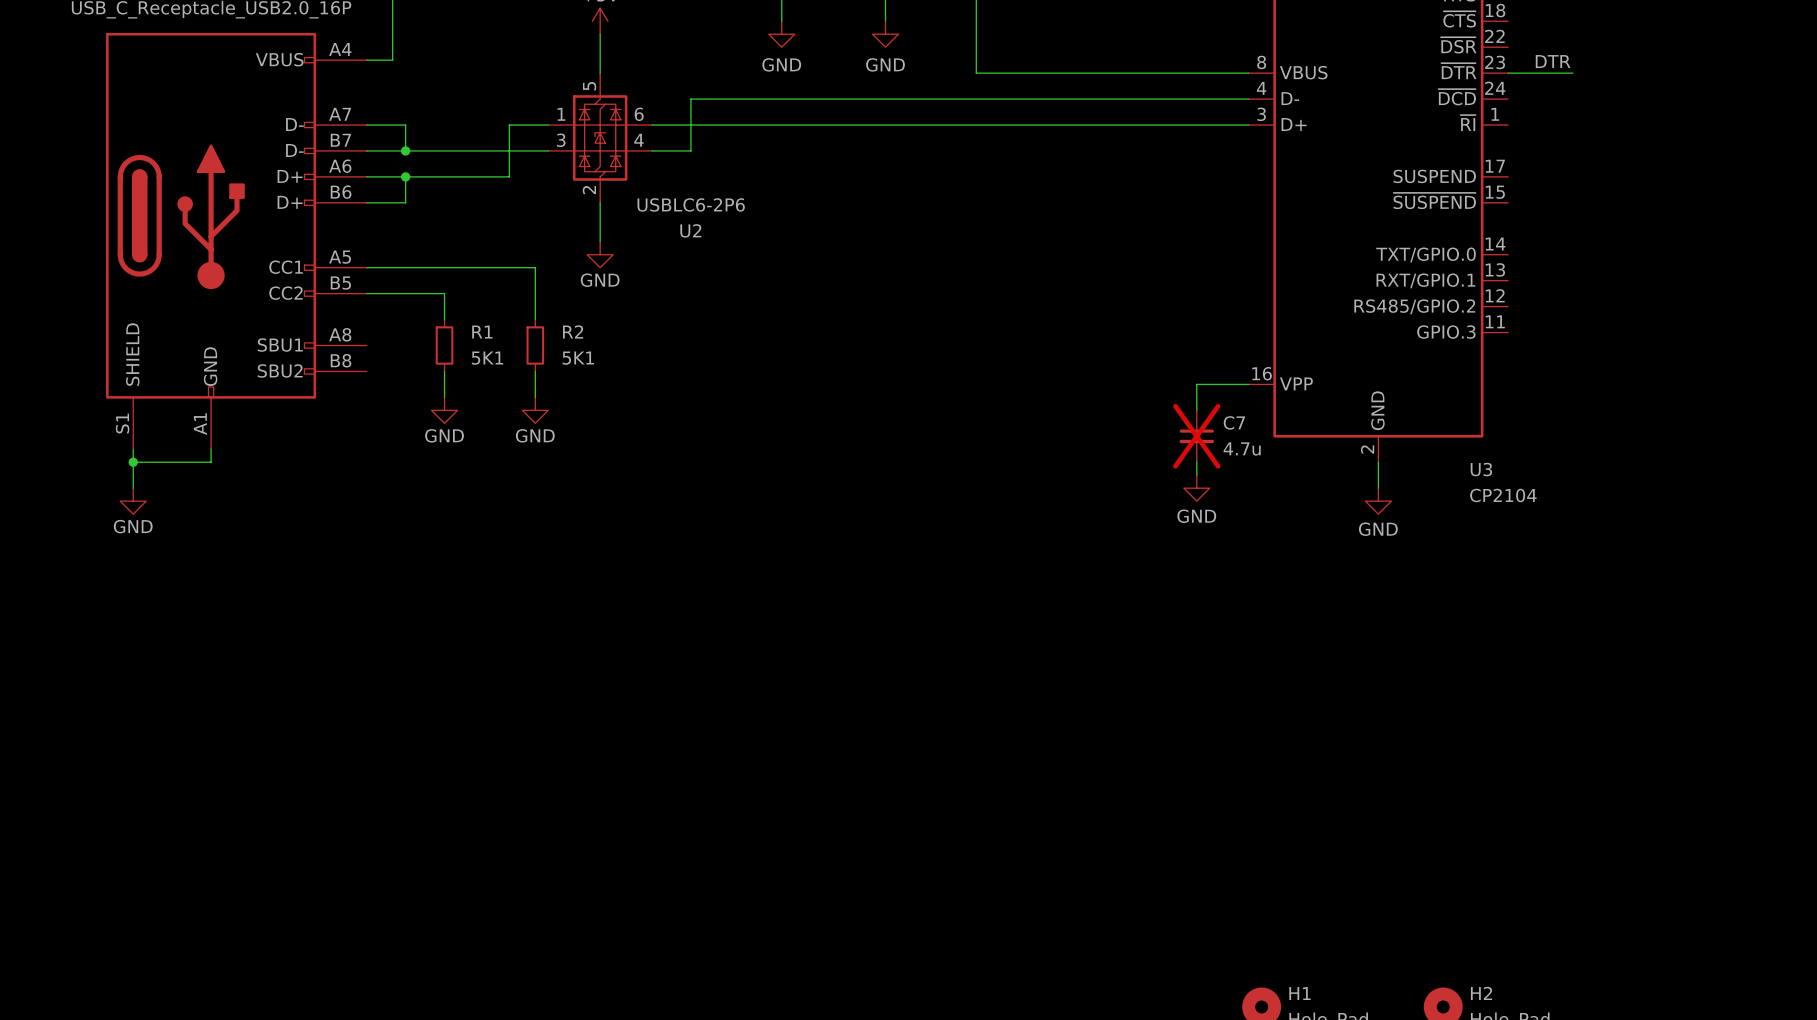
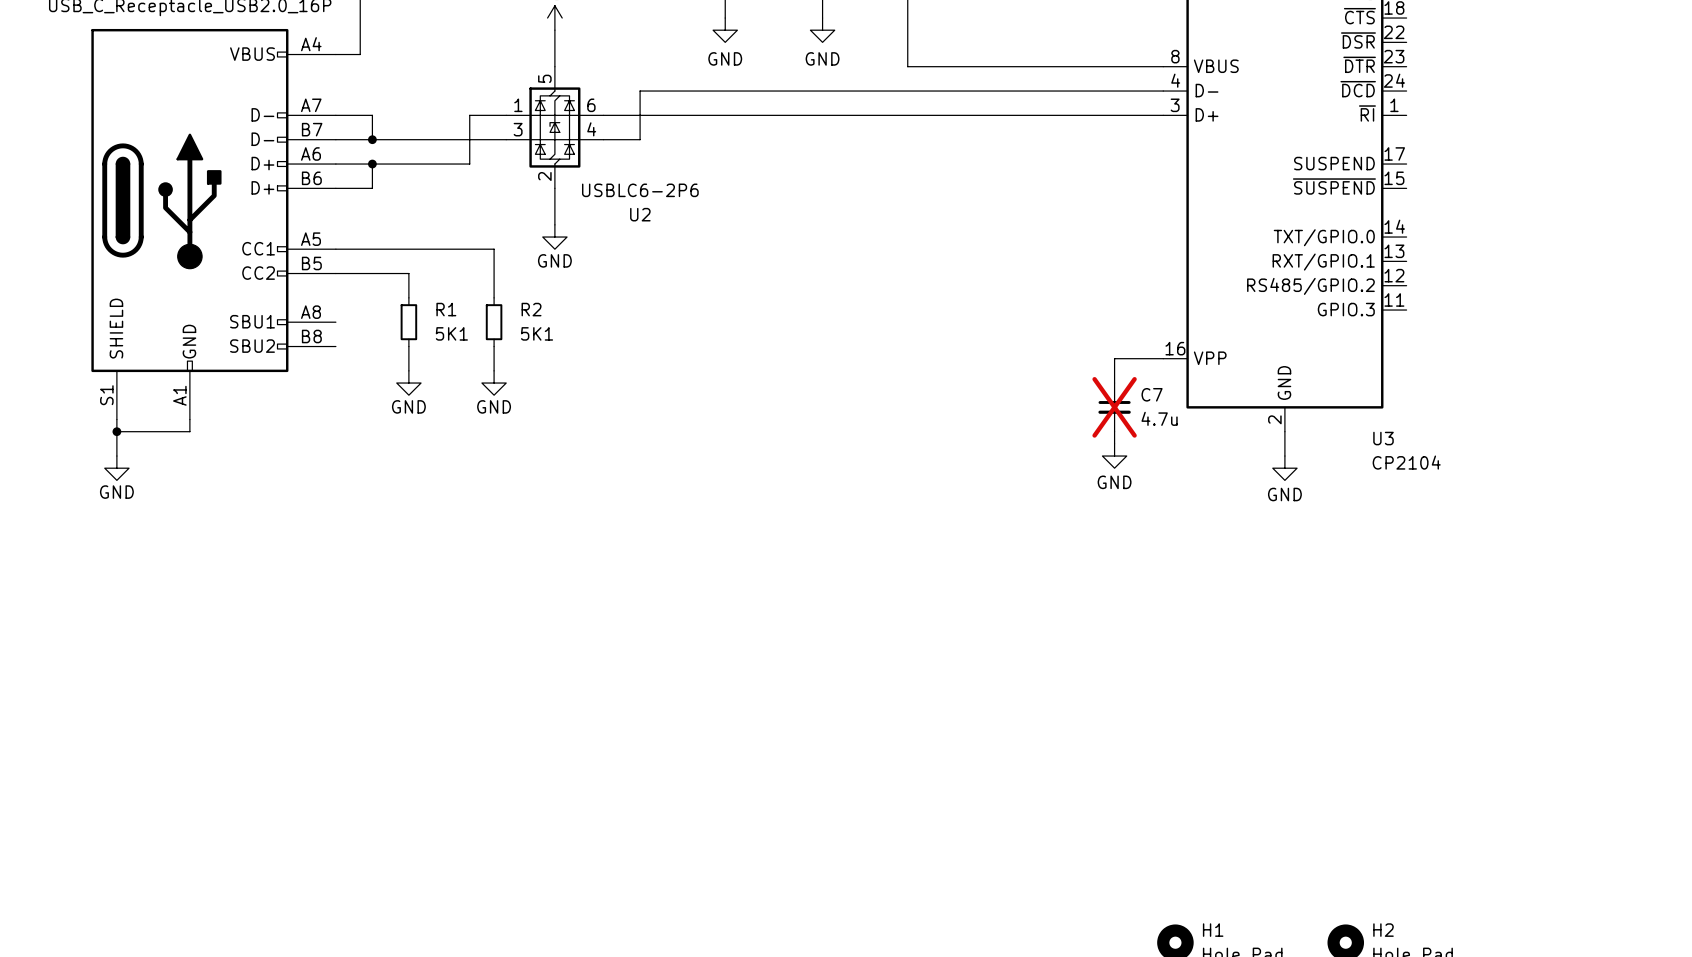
label: DTR (1553, 61) -> none
wire: (1508, 73) (1572, 73) -> none

